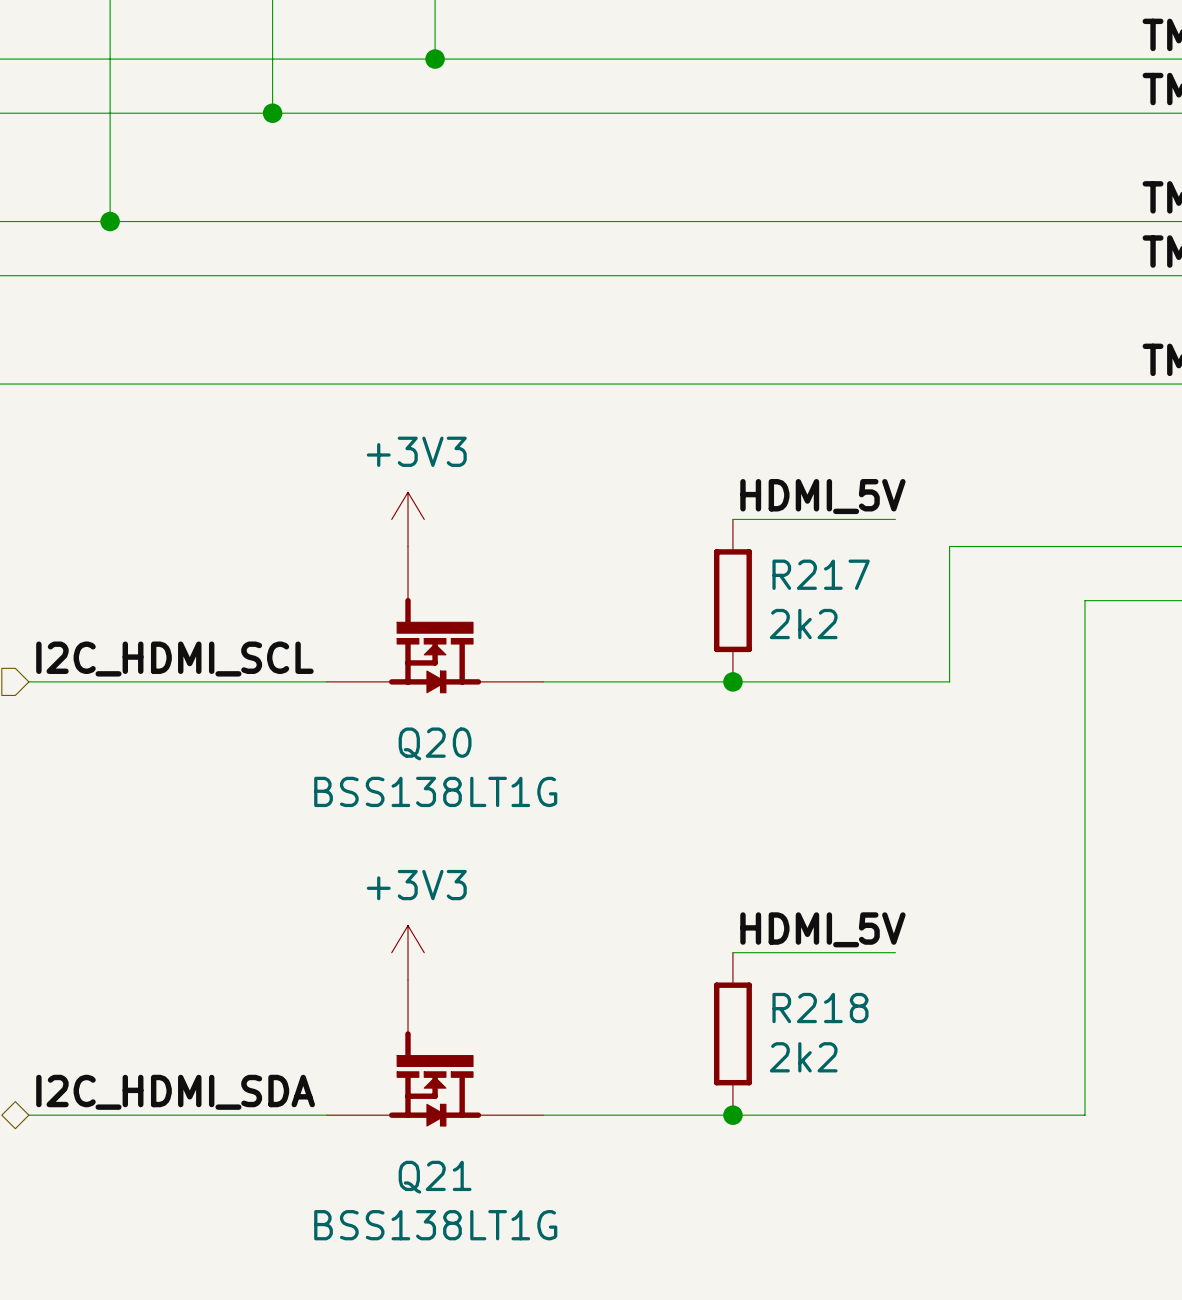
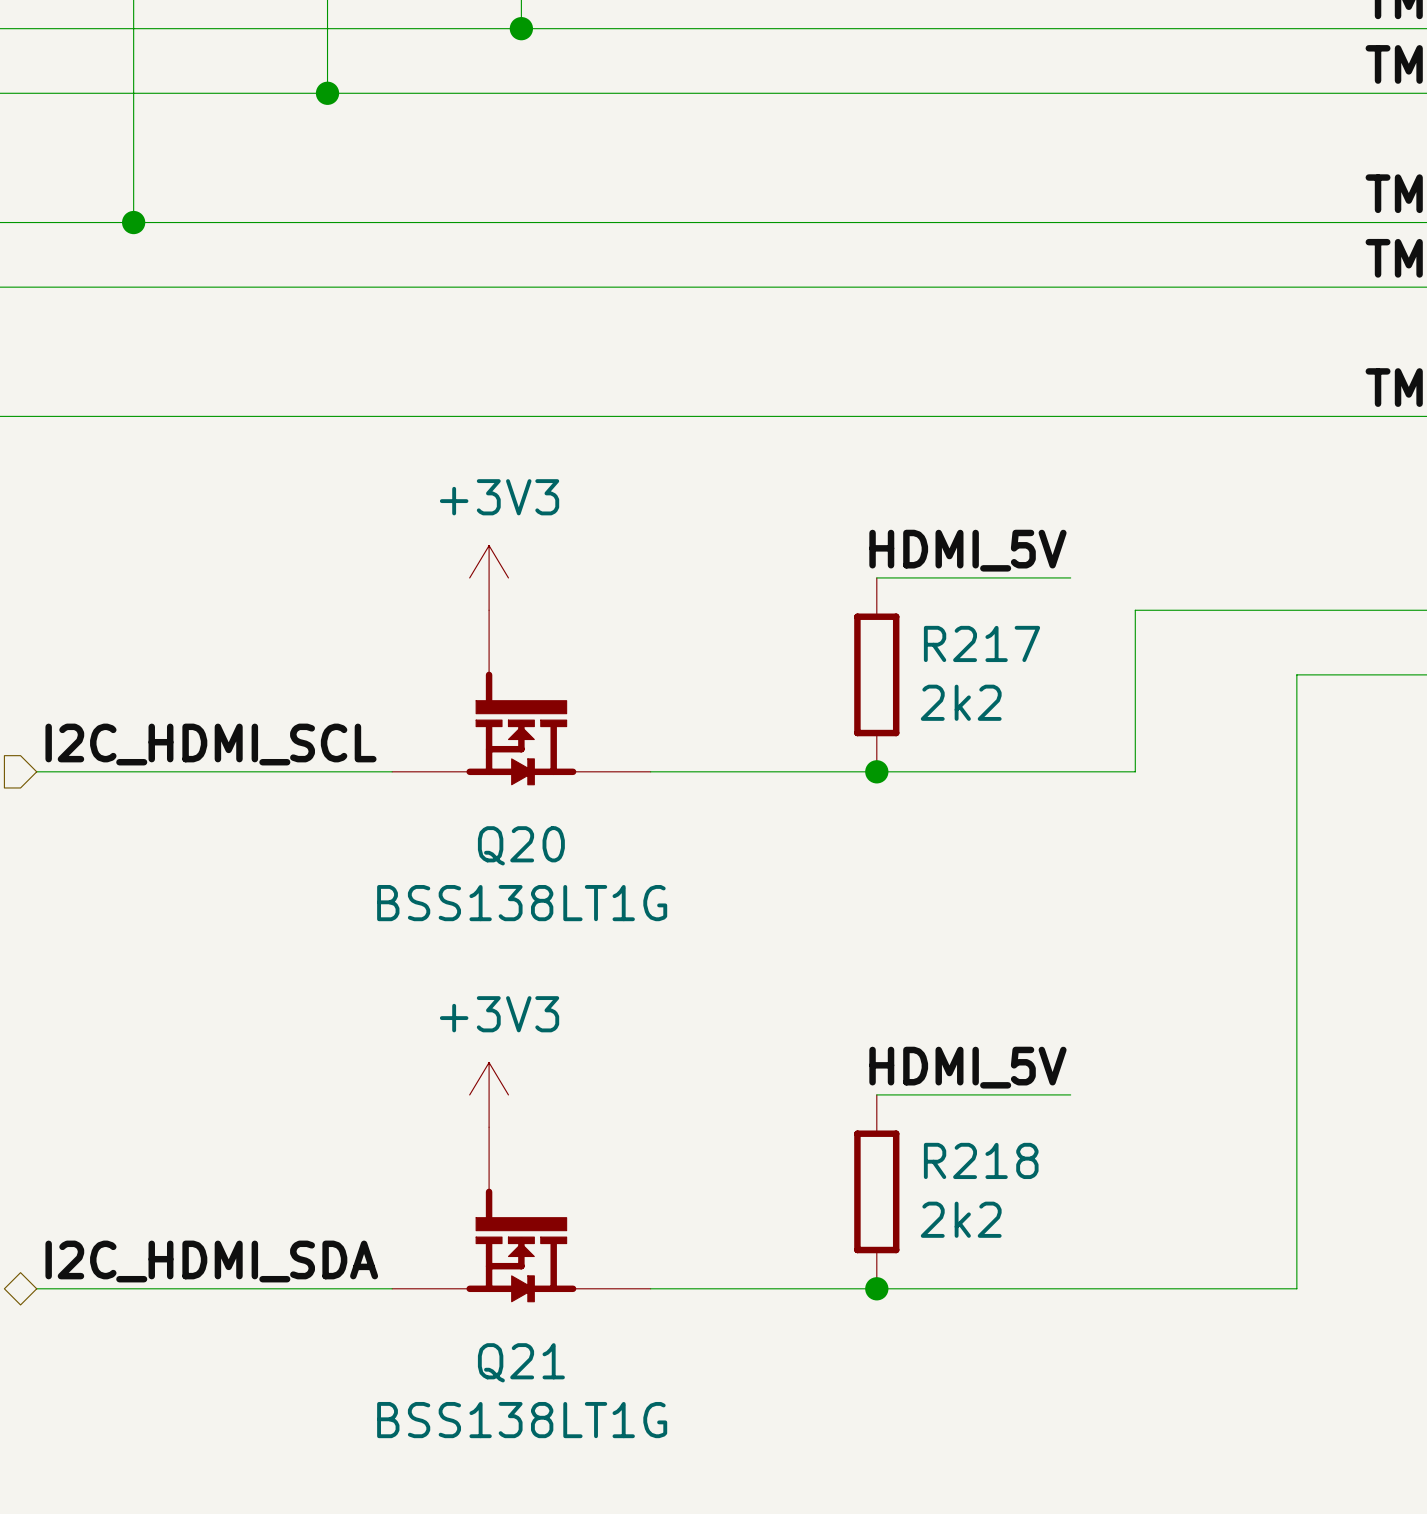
label position: HDMI_5V (822, 496) -> HDMI_5V (967, 550)
label position: HDMI_5V (822, 929) -> HDMI_5V (967, 1067)

